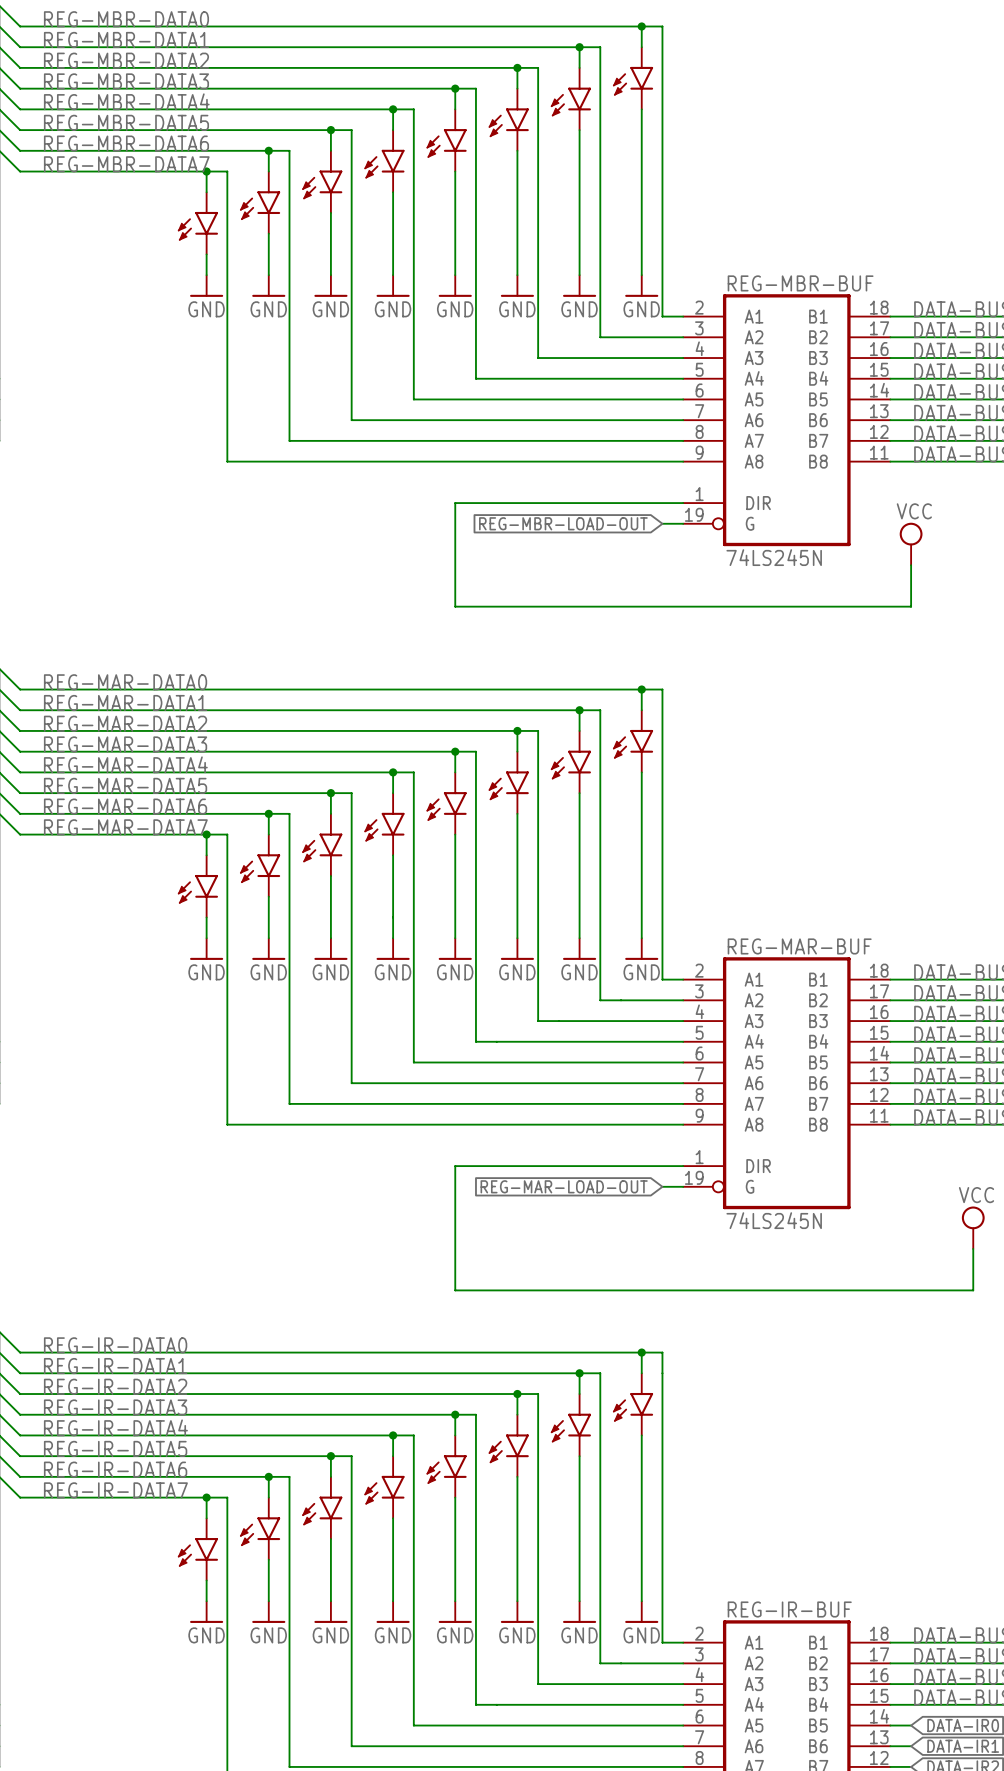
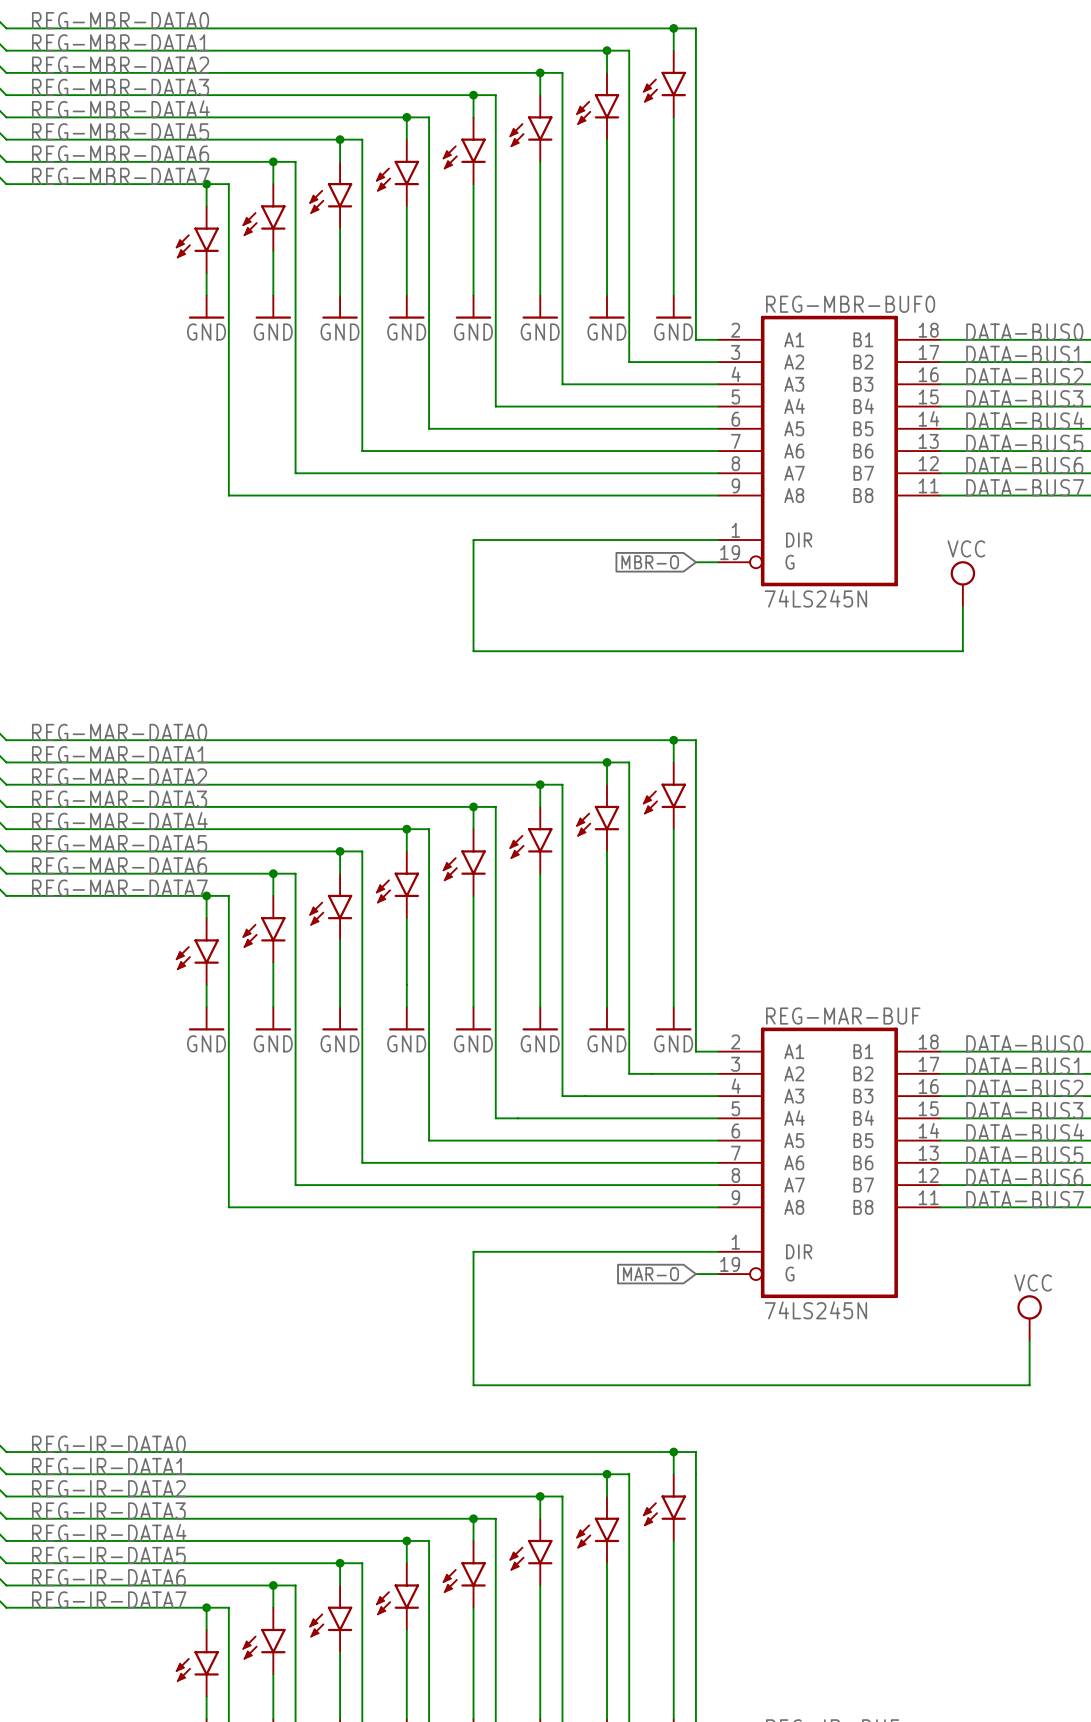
REG-MBR-BUF name: REG-MBR-BUF (800, 283) -> REG-MBR-BUF0 (850, 304)
global label: REG-MBR-LOAD-OUT (563, 523) -> MBR-O (650, 562)
global label: REG-MAR-LOAD-OUT (564, 1186) -> MAR-O (650, 1274)

